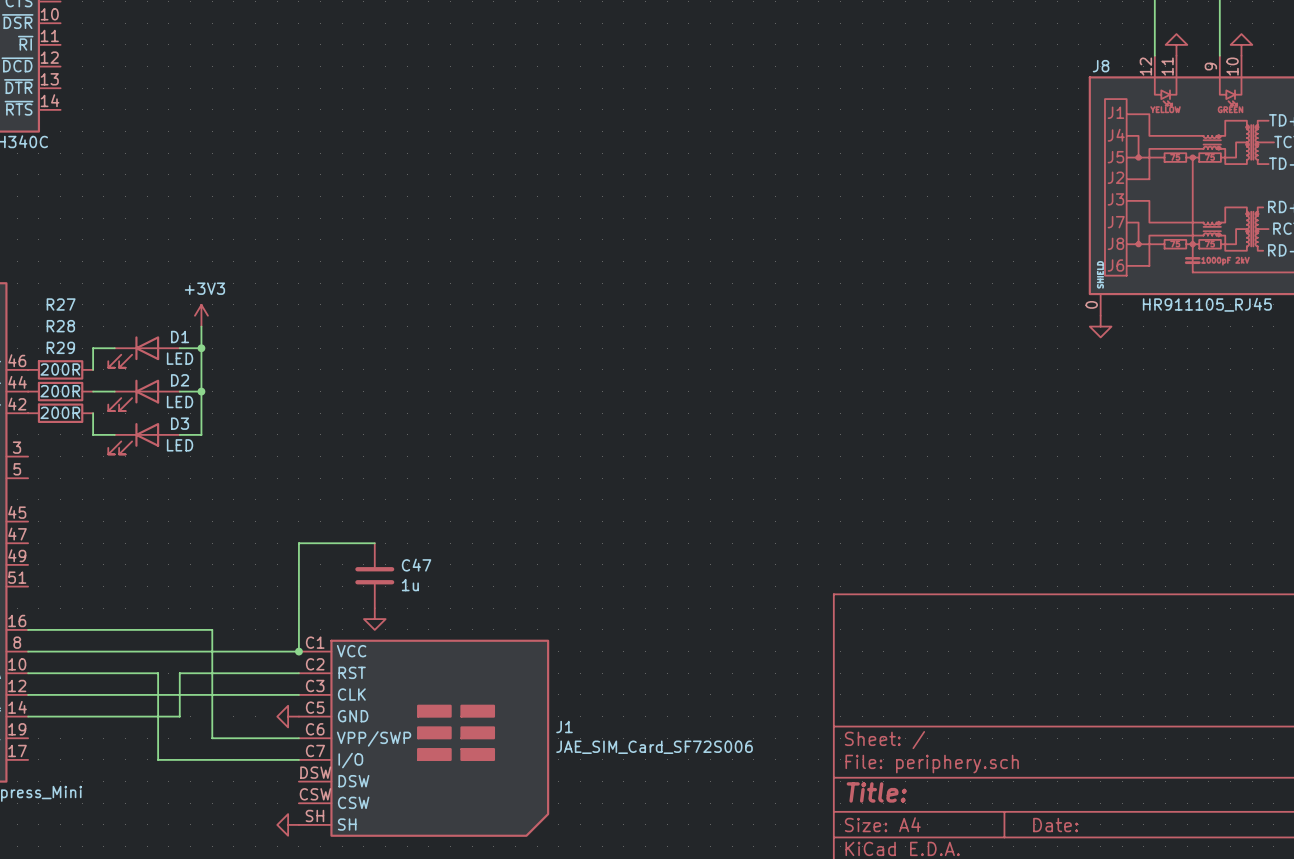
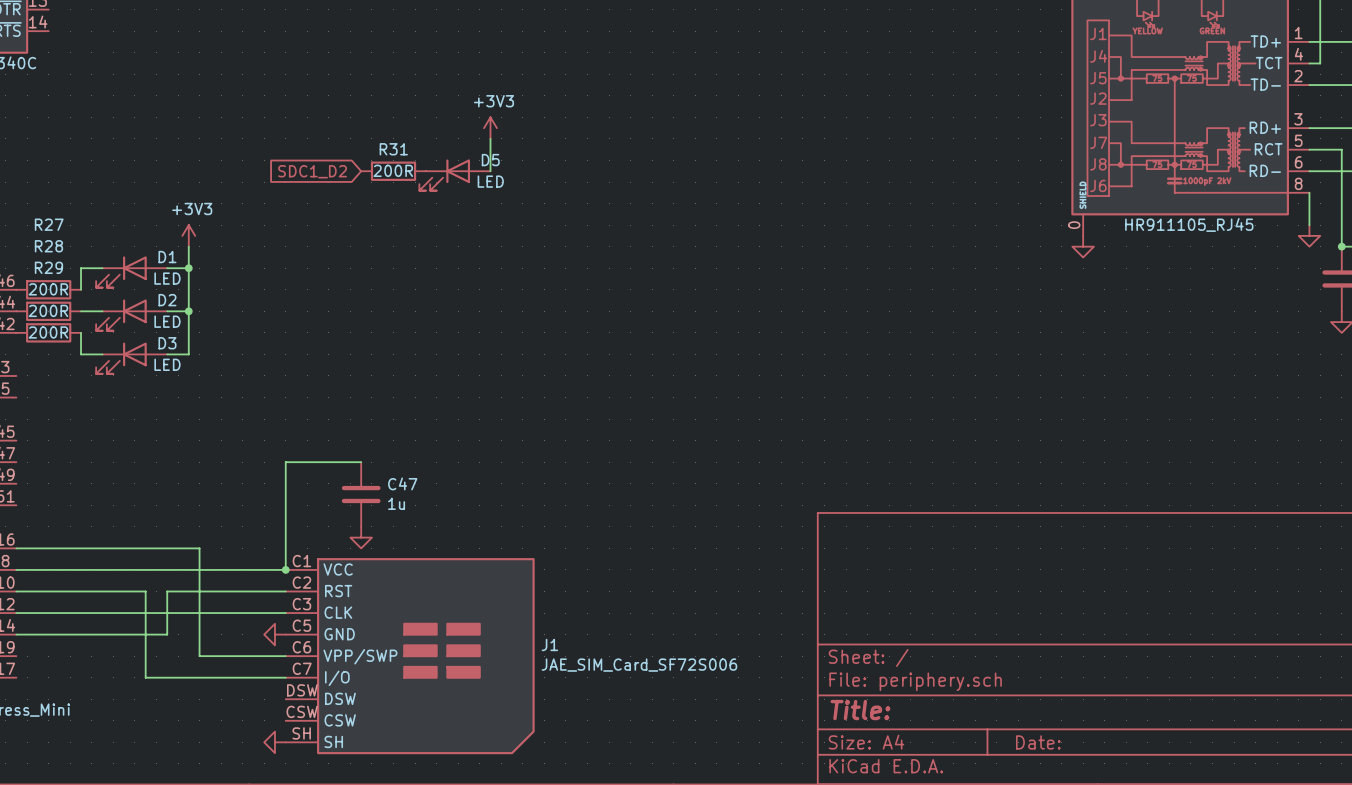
power symbol: none -> +3V3 (490, 128)
wire: none -> (490, 138) (490, 171)
R31: none -> 200R (393, 171)
global label: none -> SDC1_D2 (312, 171)
D5: none -> LED (454, 175)

